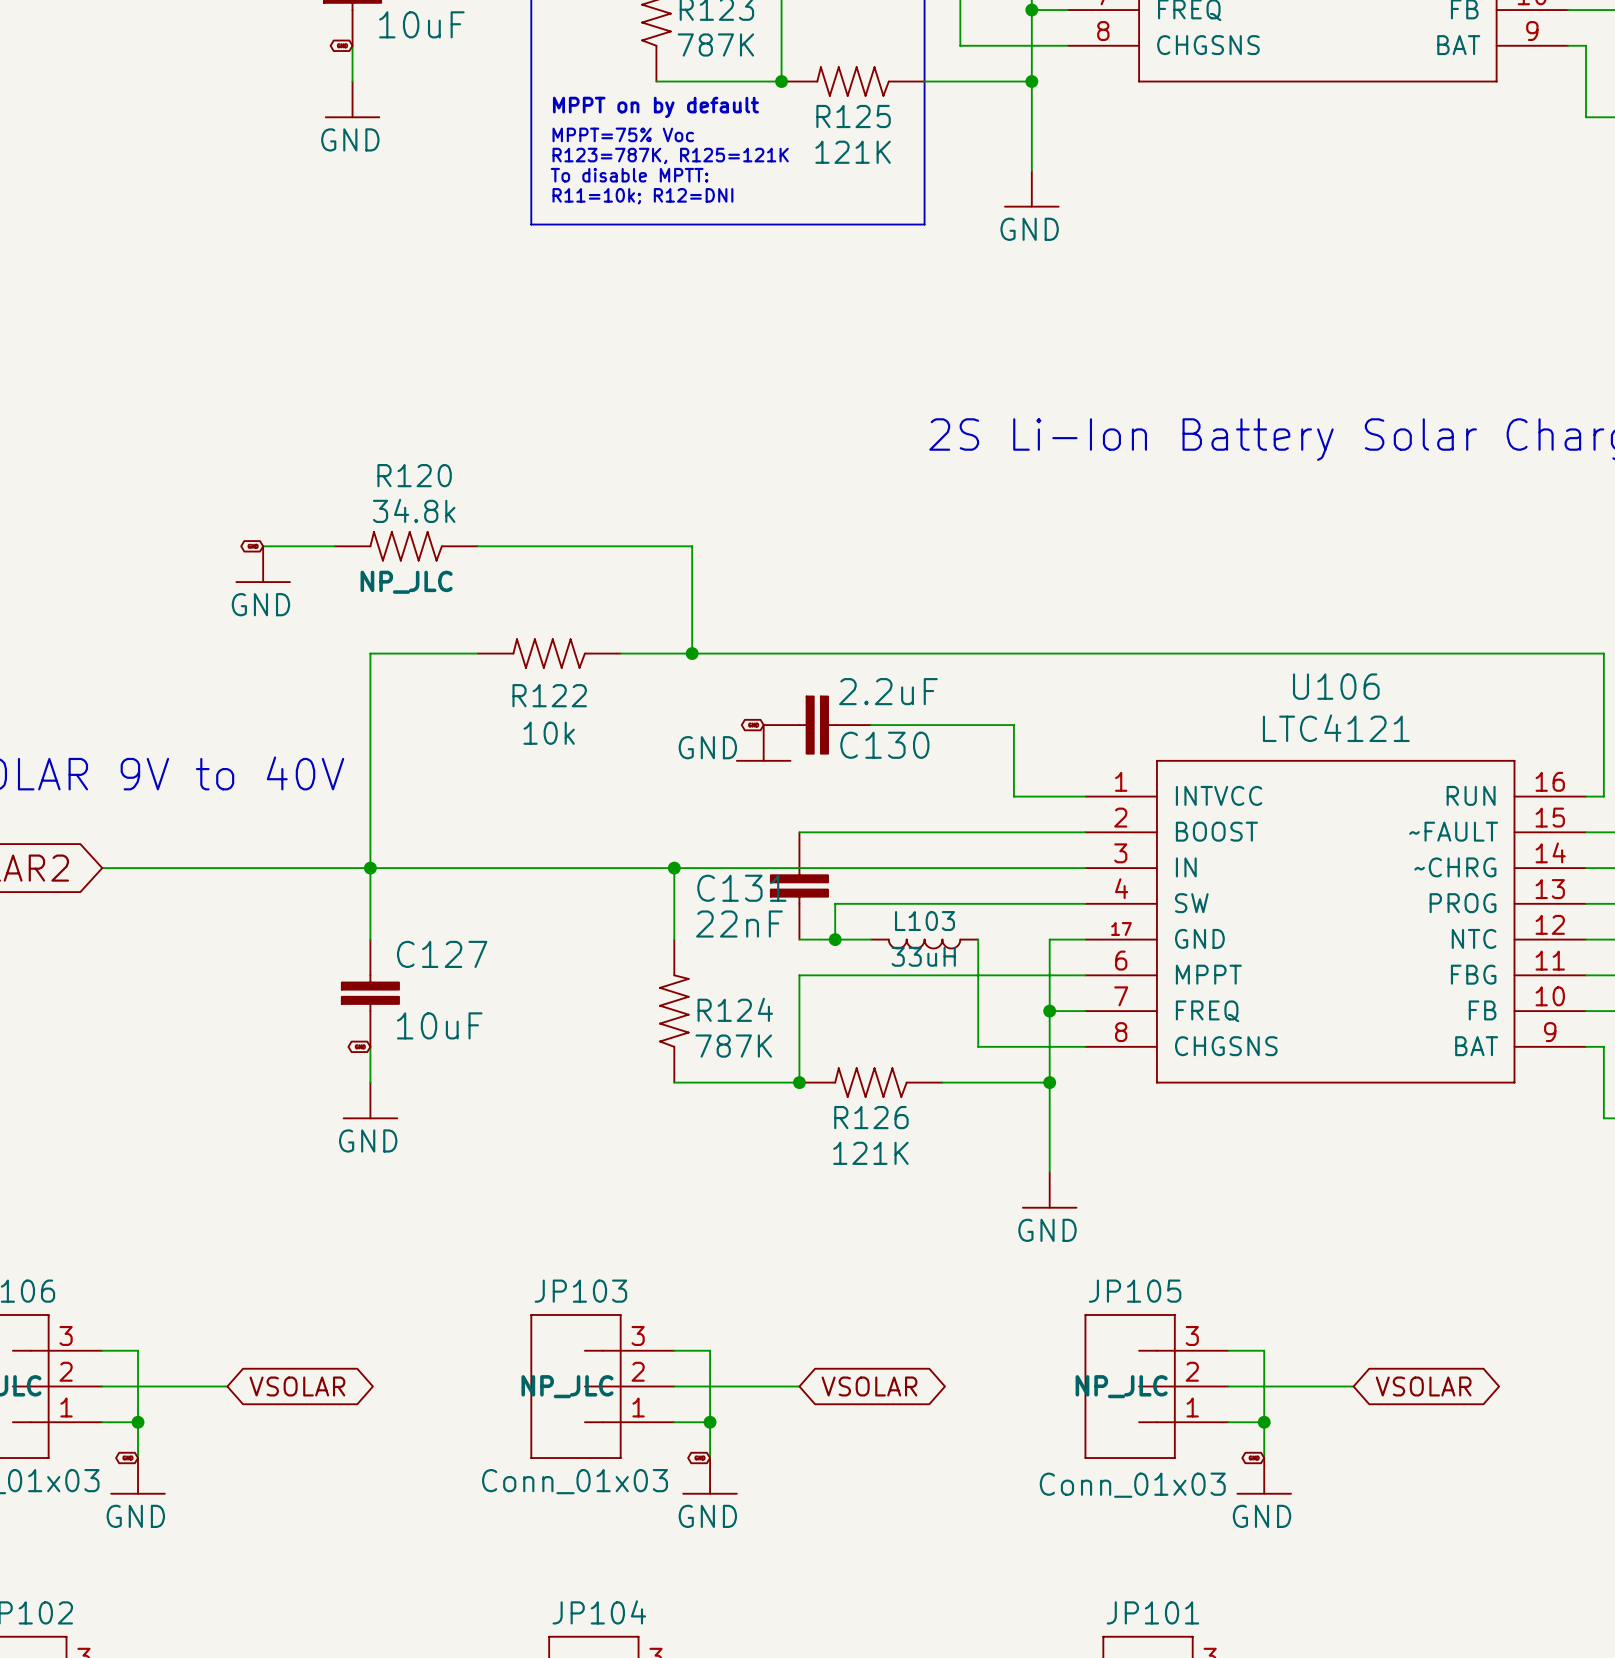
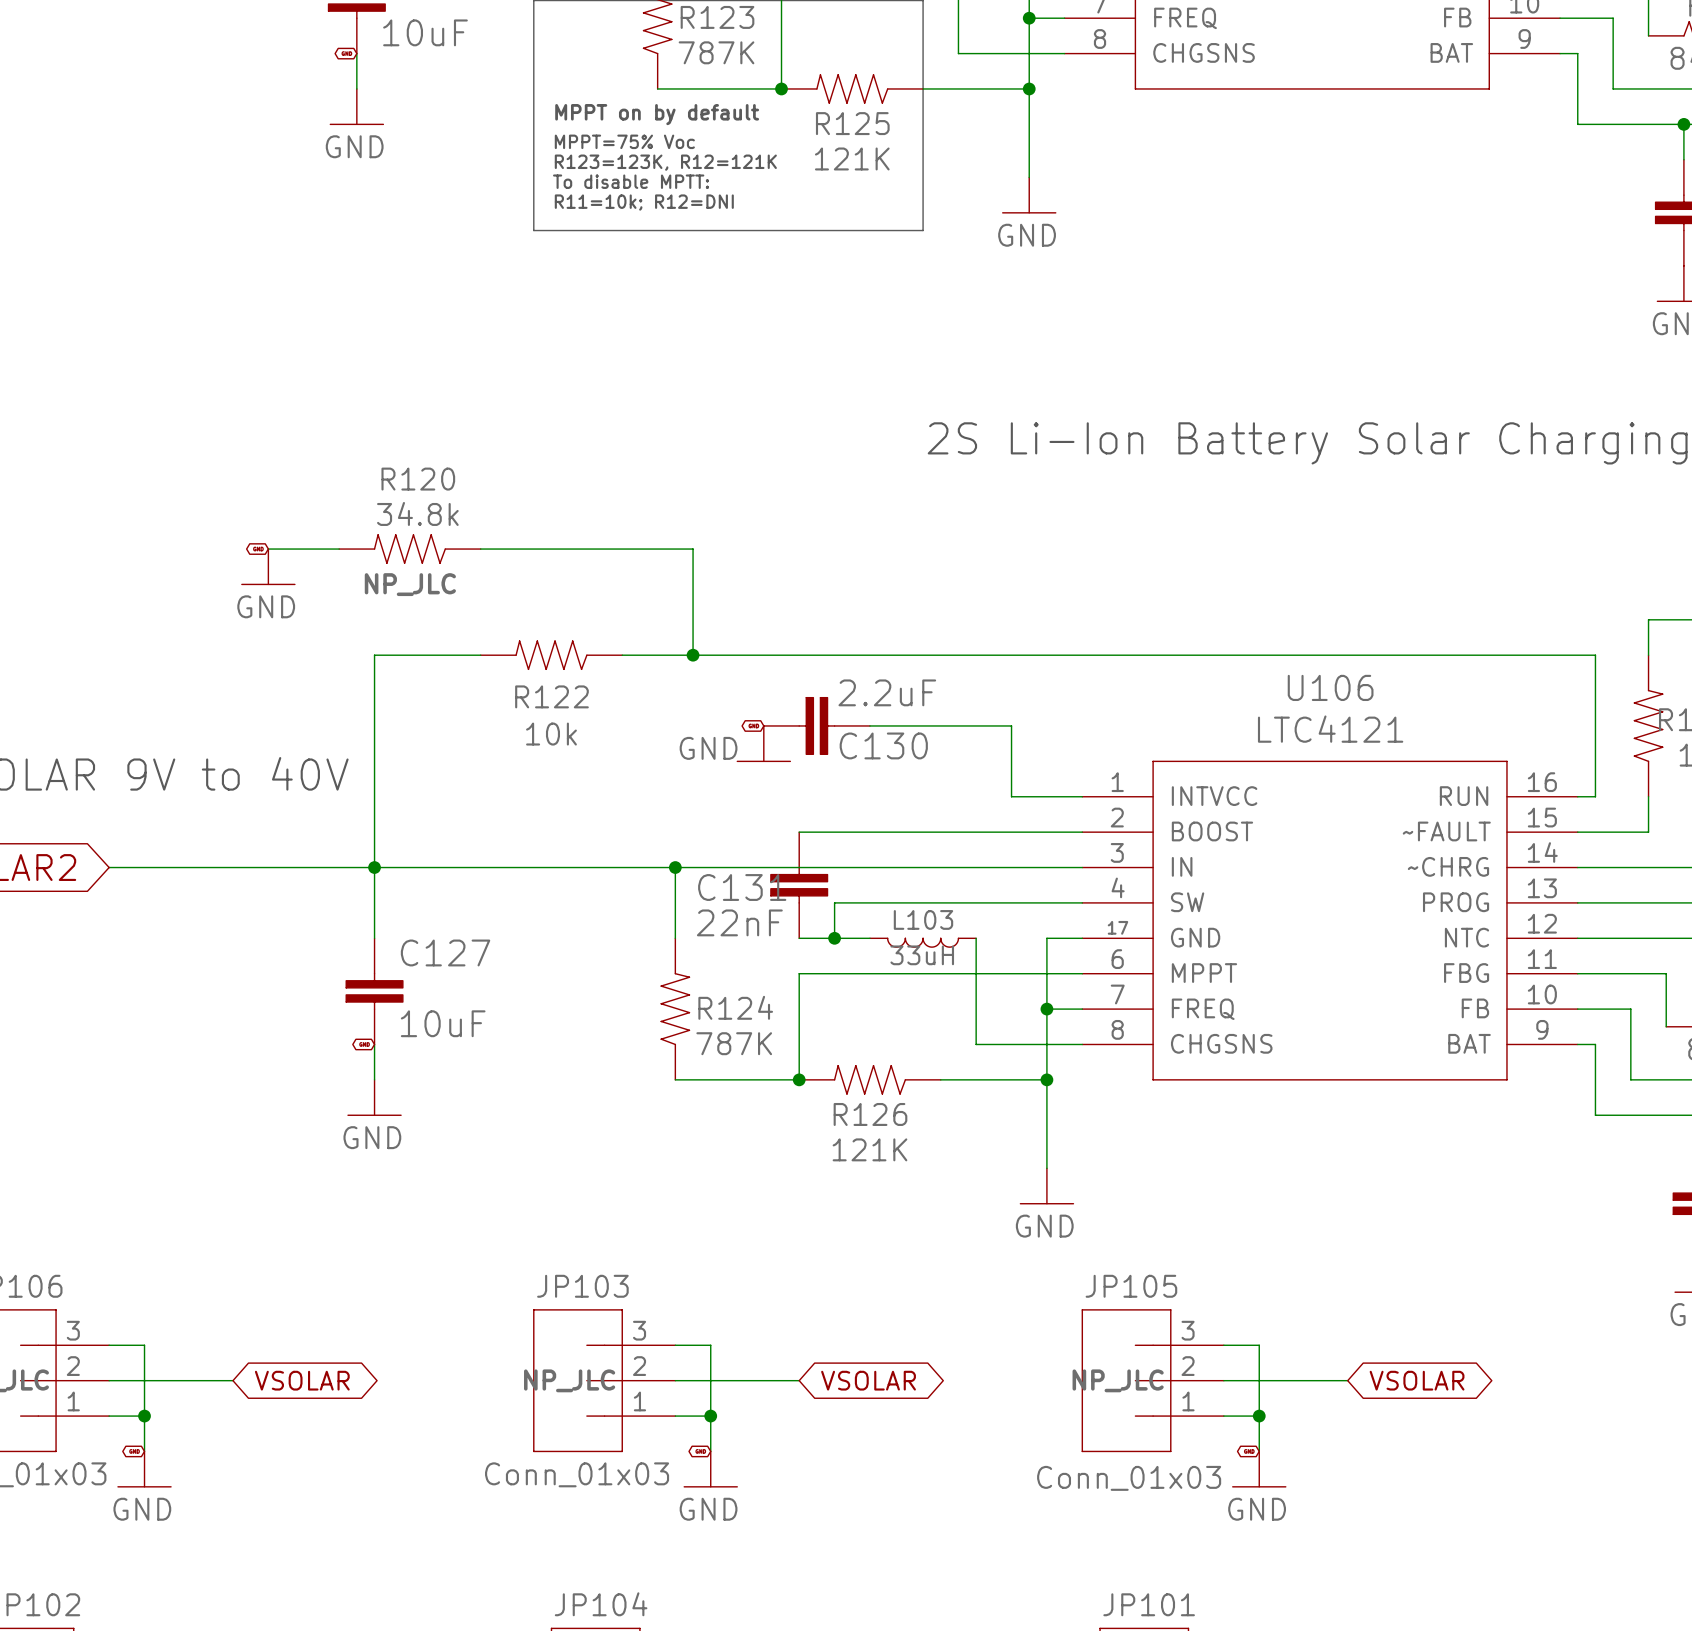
text: R123=787K, R125=121K (670, 155) -> R123=123K, R12=121K (665, 162)

